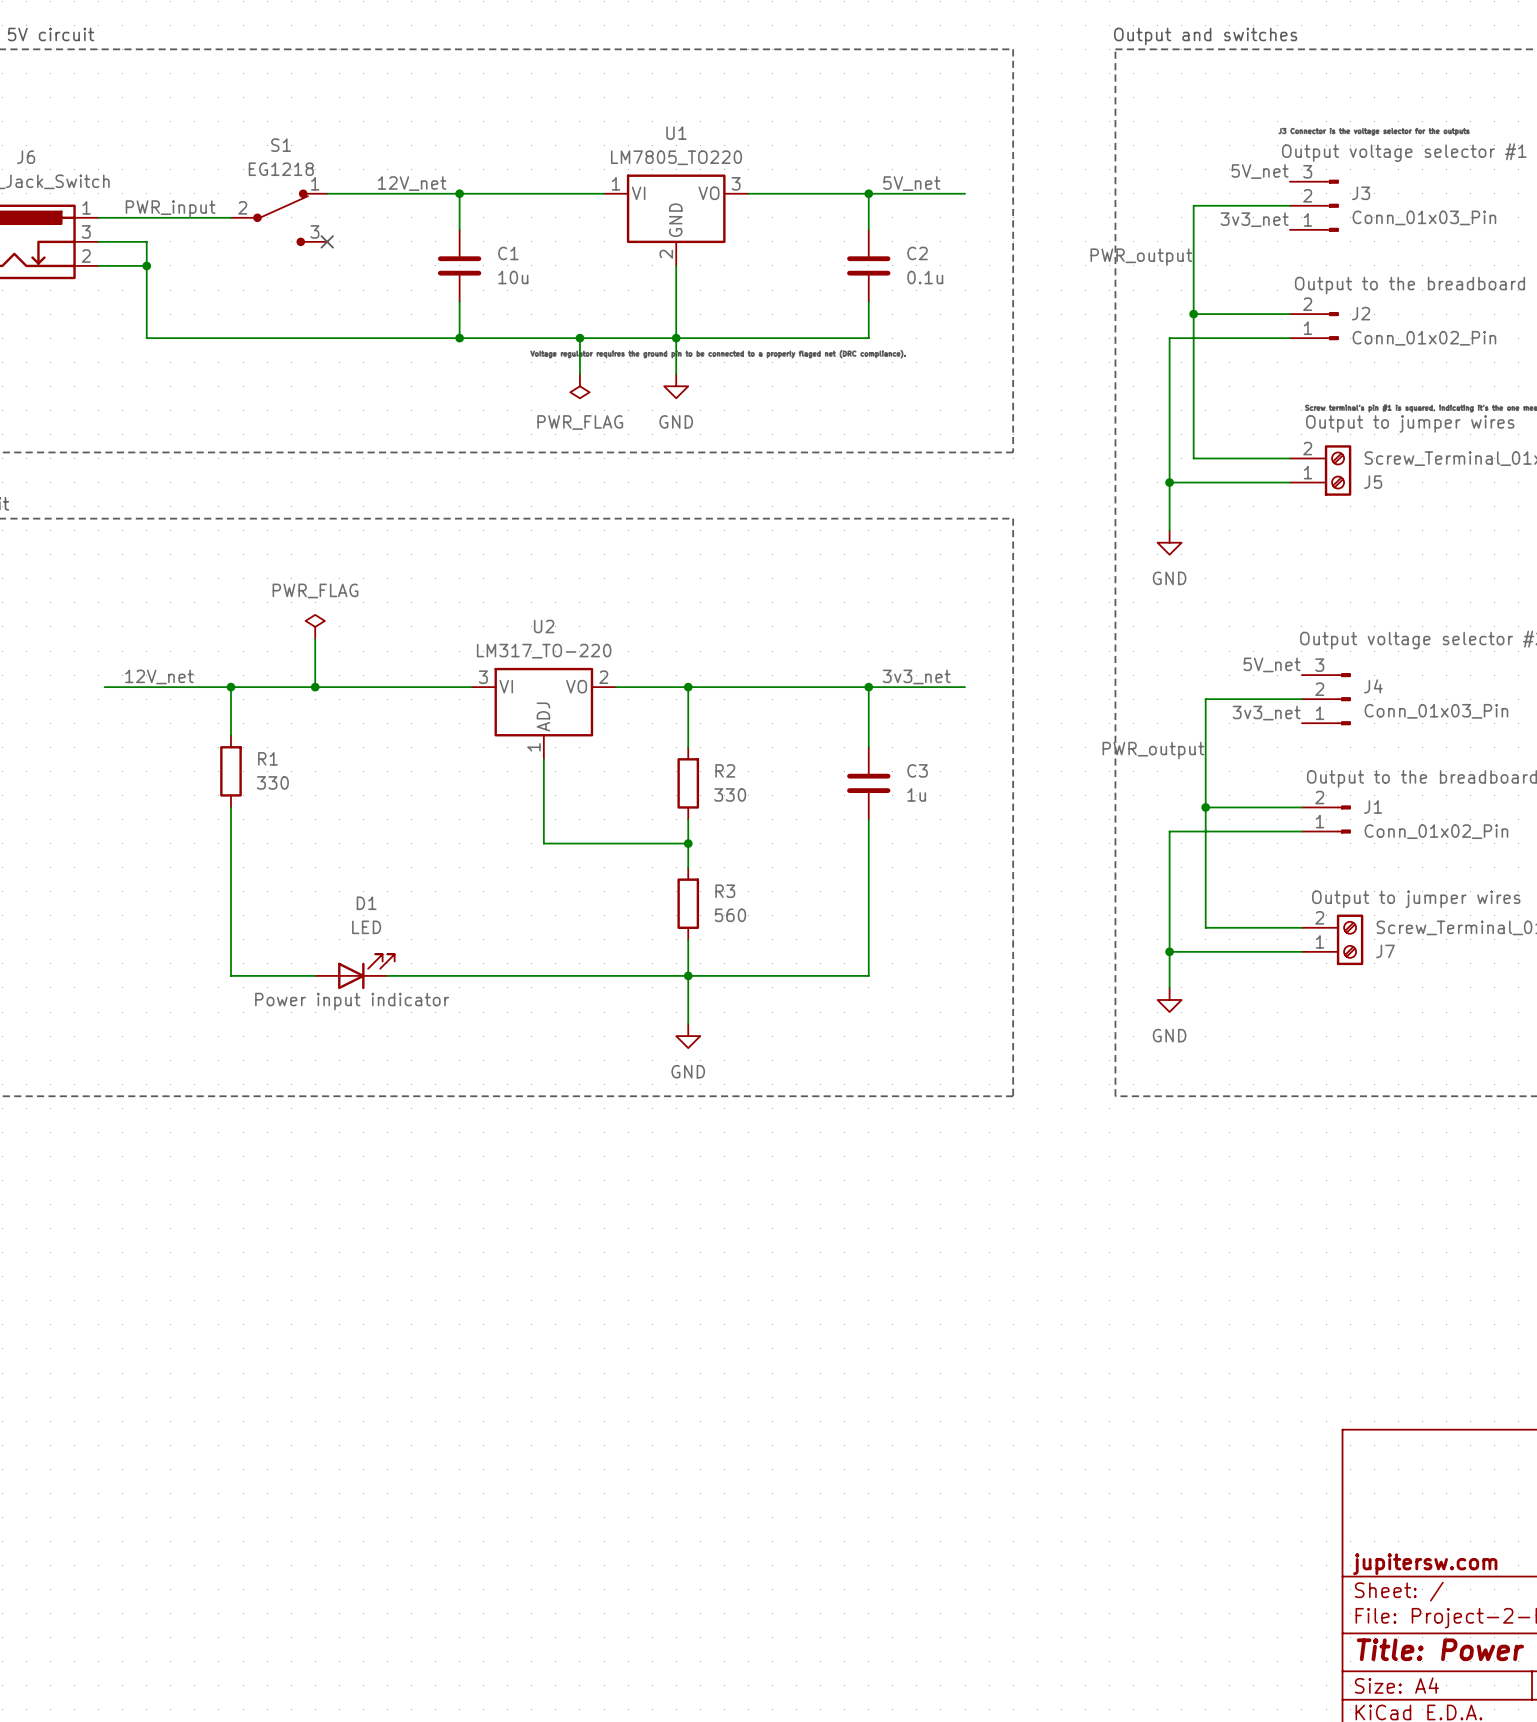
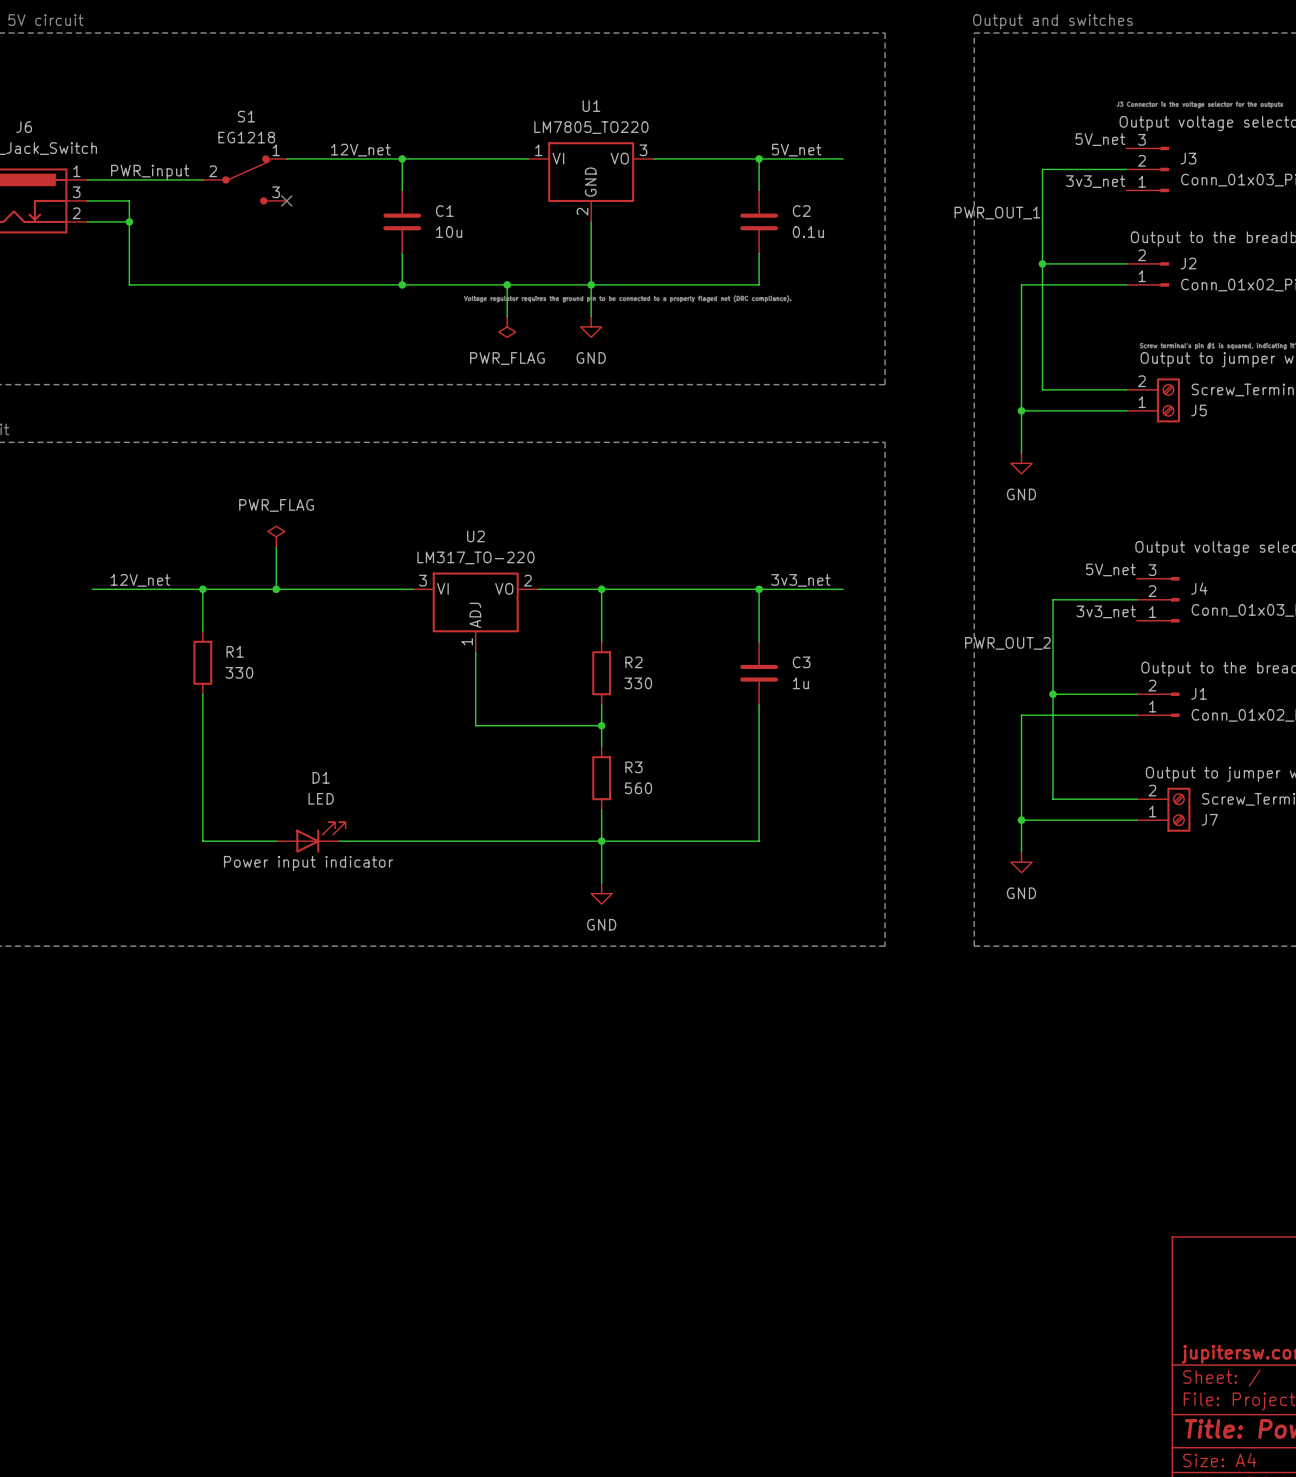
label: PWR_output (1141, 257) -> PWR_OUT_1 (997, 213)
label: PWR_output (1153, 750) -> PWR_OUT_2 (1007, 643)

